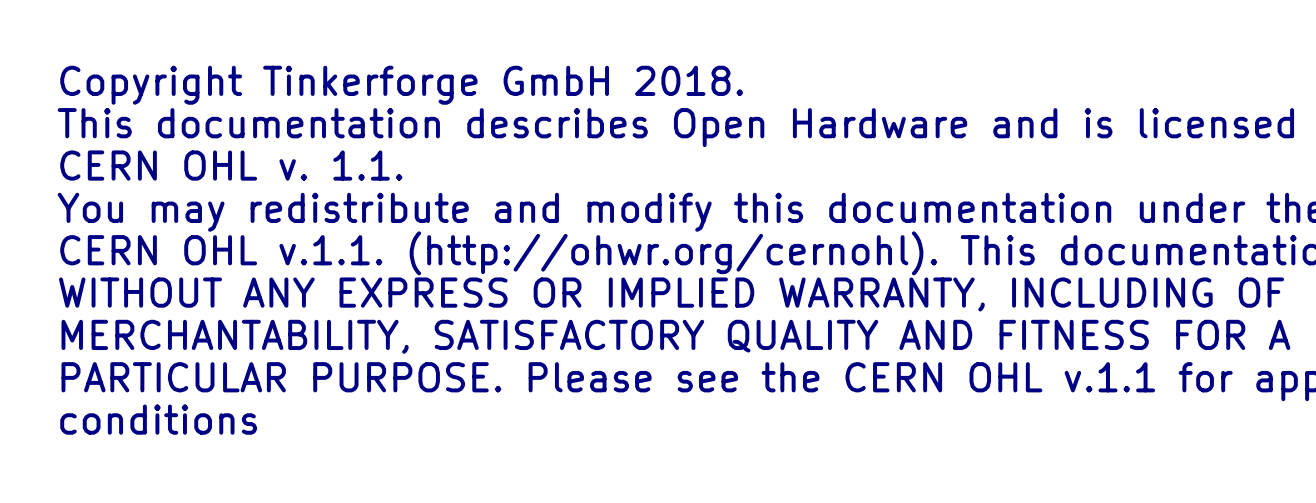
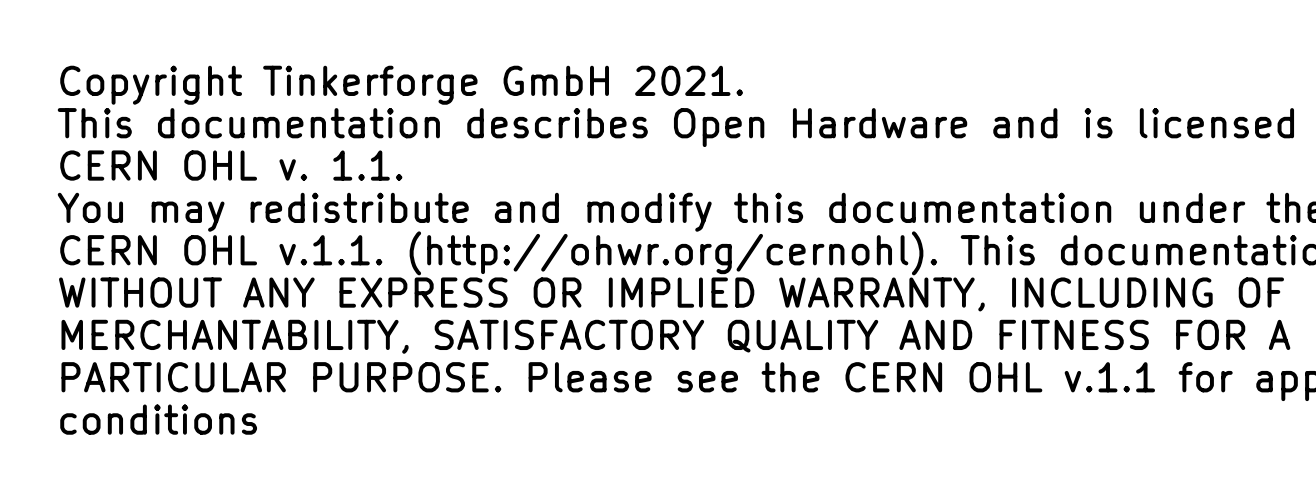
text: Copyright Tinkerforge GmbH 2018. (401, 85) -> Copyright Tinkerforge GmbH 2021. (401, 85)

